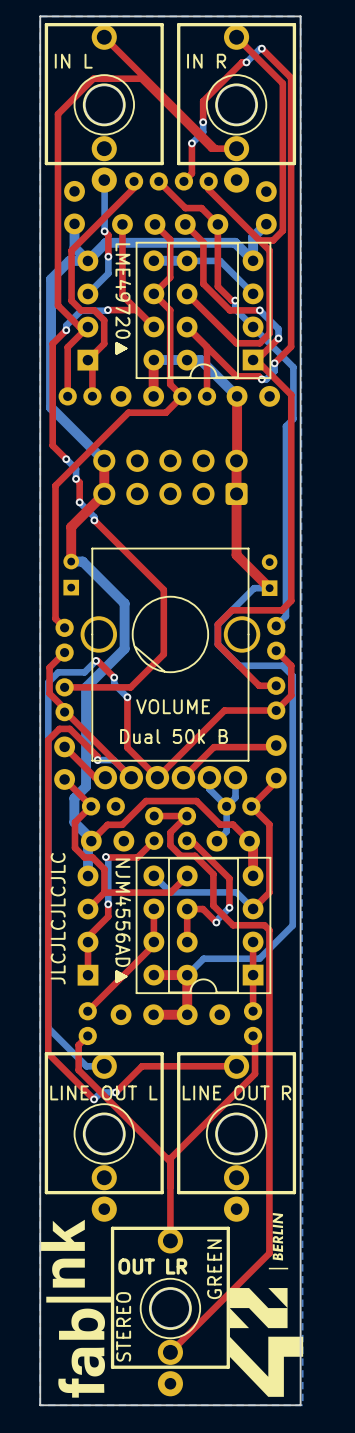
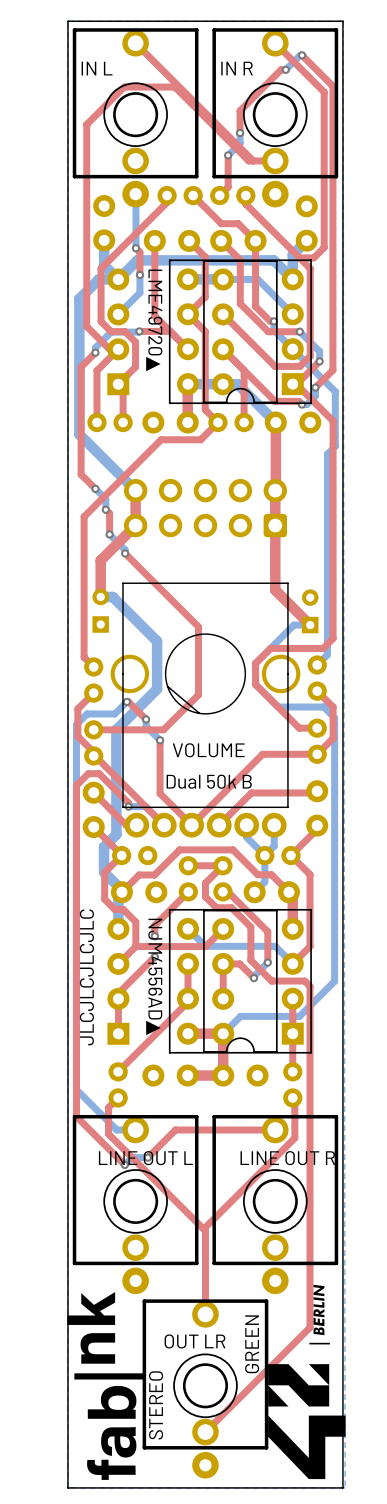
top track: (105, 856) (137, 857) -> (154, 936) (154, 925) (170, 909)
bottom track: (105, 856) (108, 859) (108, 904) -> none
via: (105, 856) -> none
via: none -> (154, 936)
via: none -> (154, 956)
top track: (108, 904) (108, 916) -> (154, 956) (139, 971)
via: (108, 904) -> none

